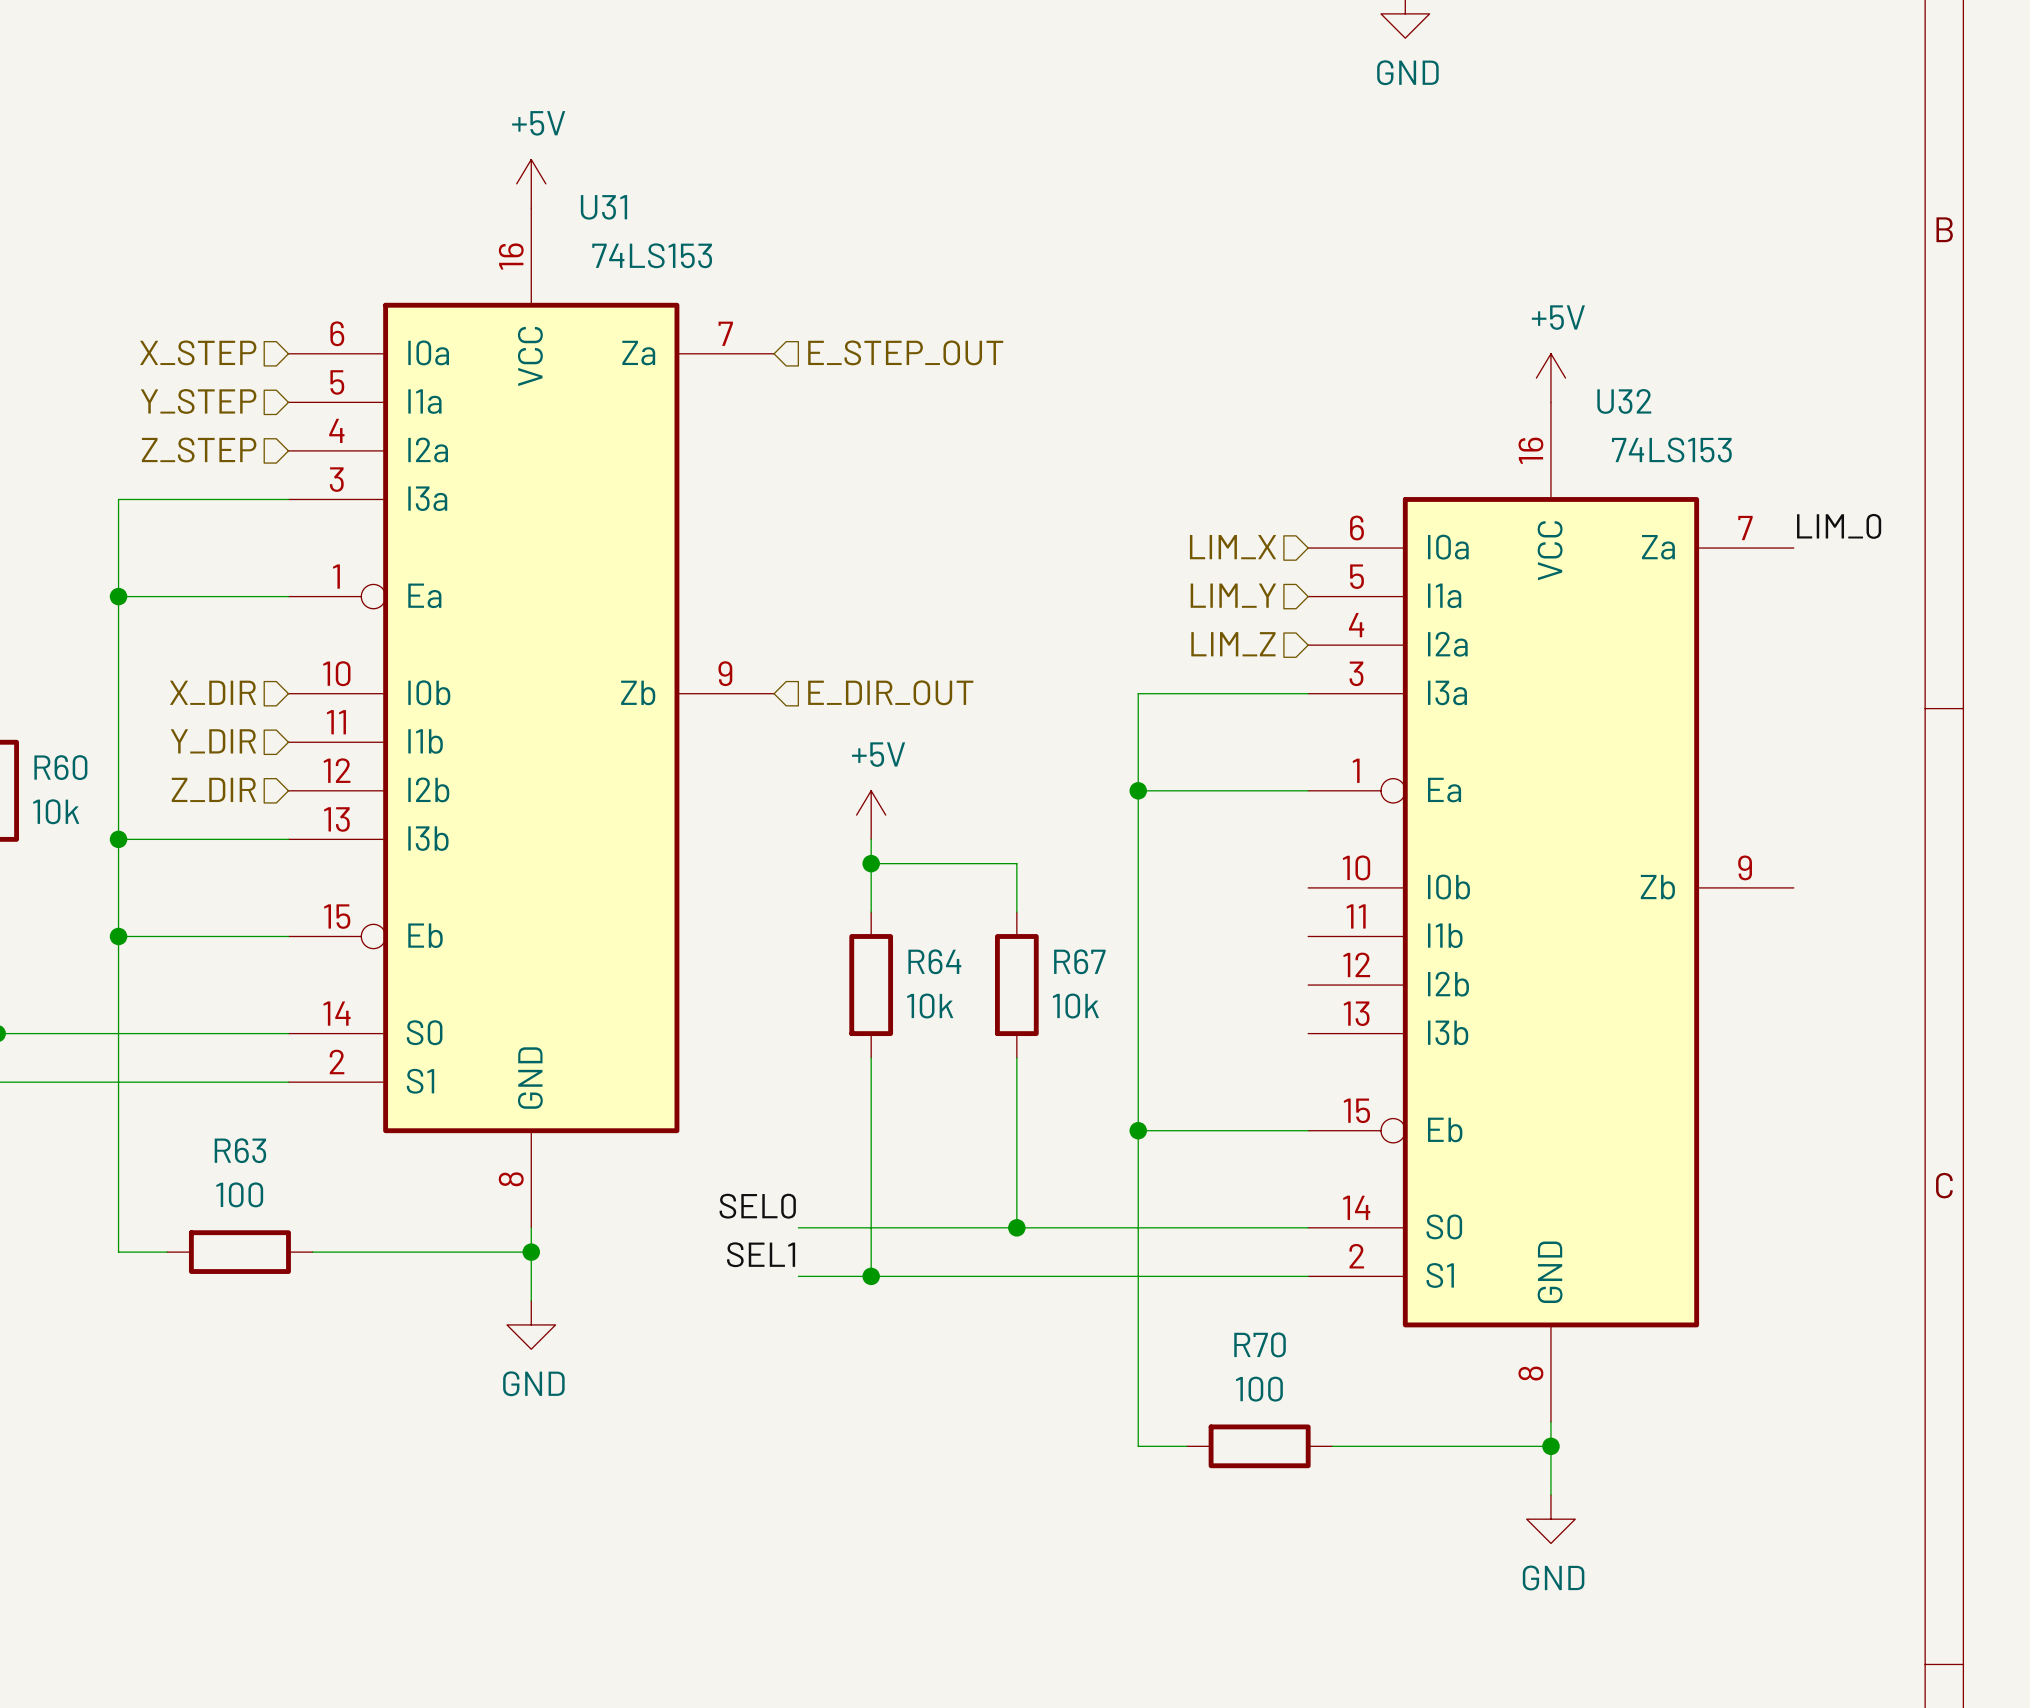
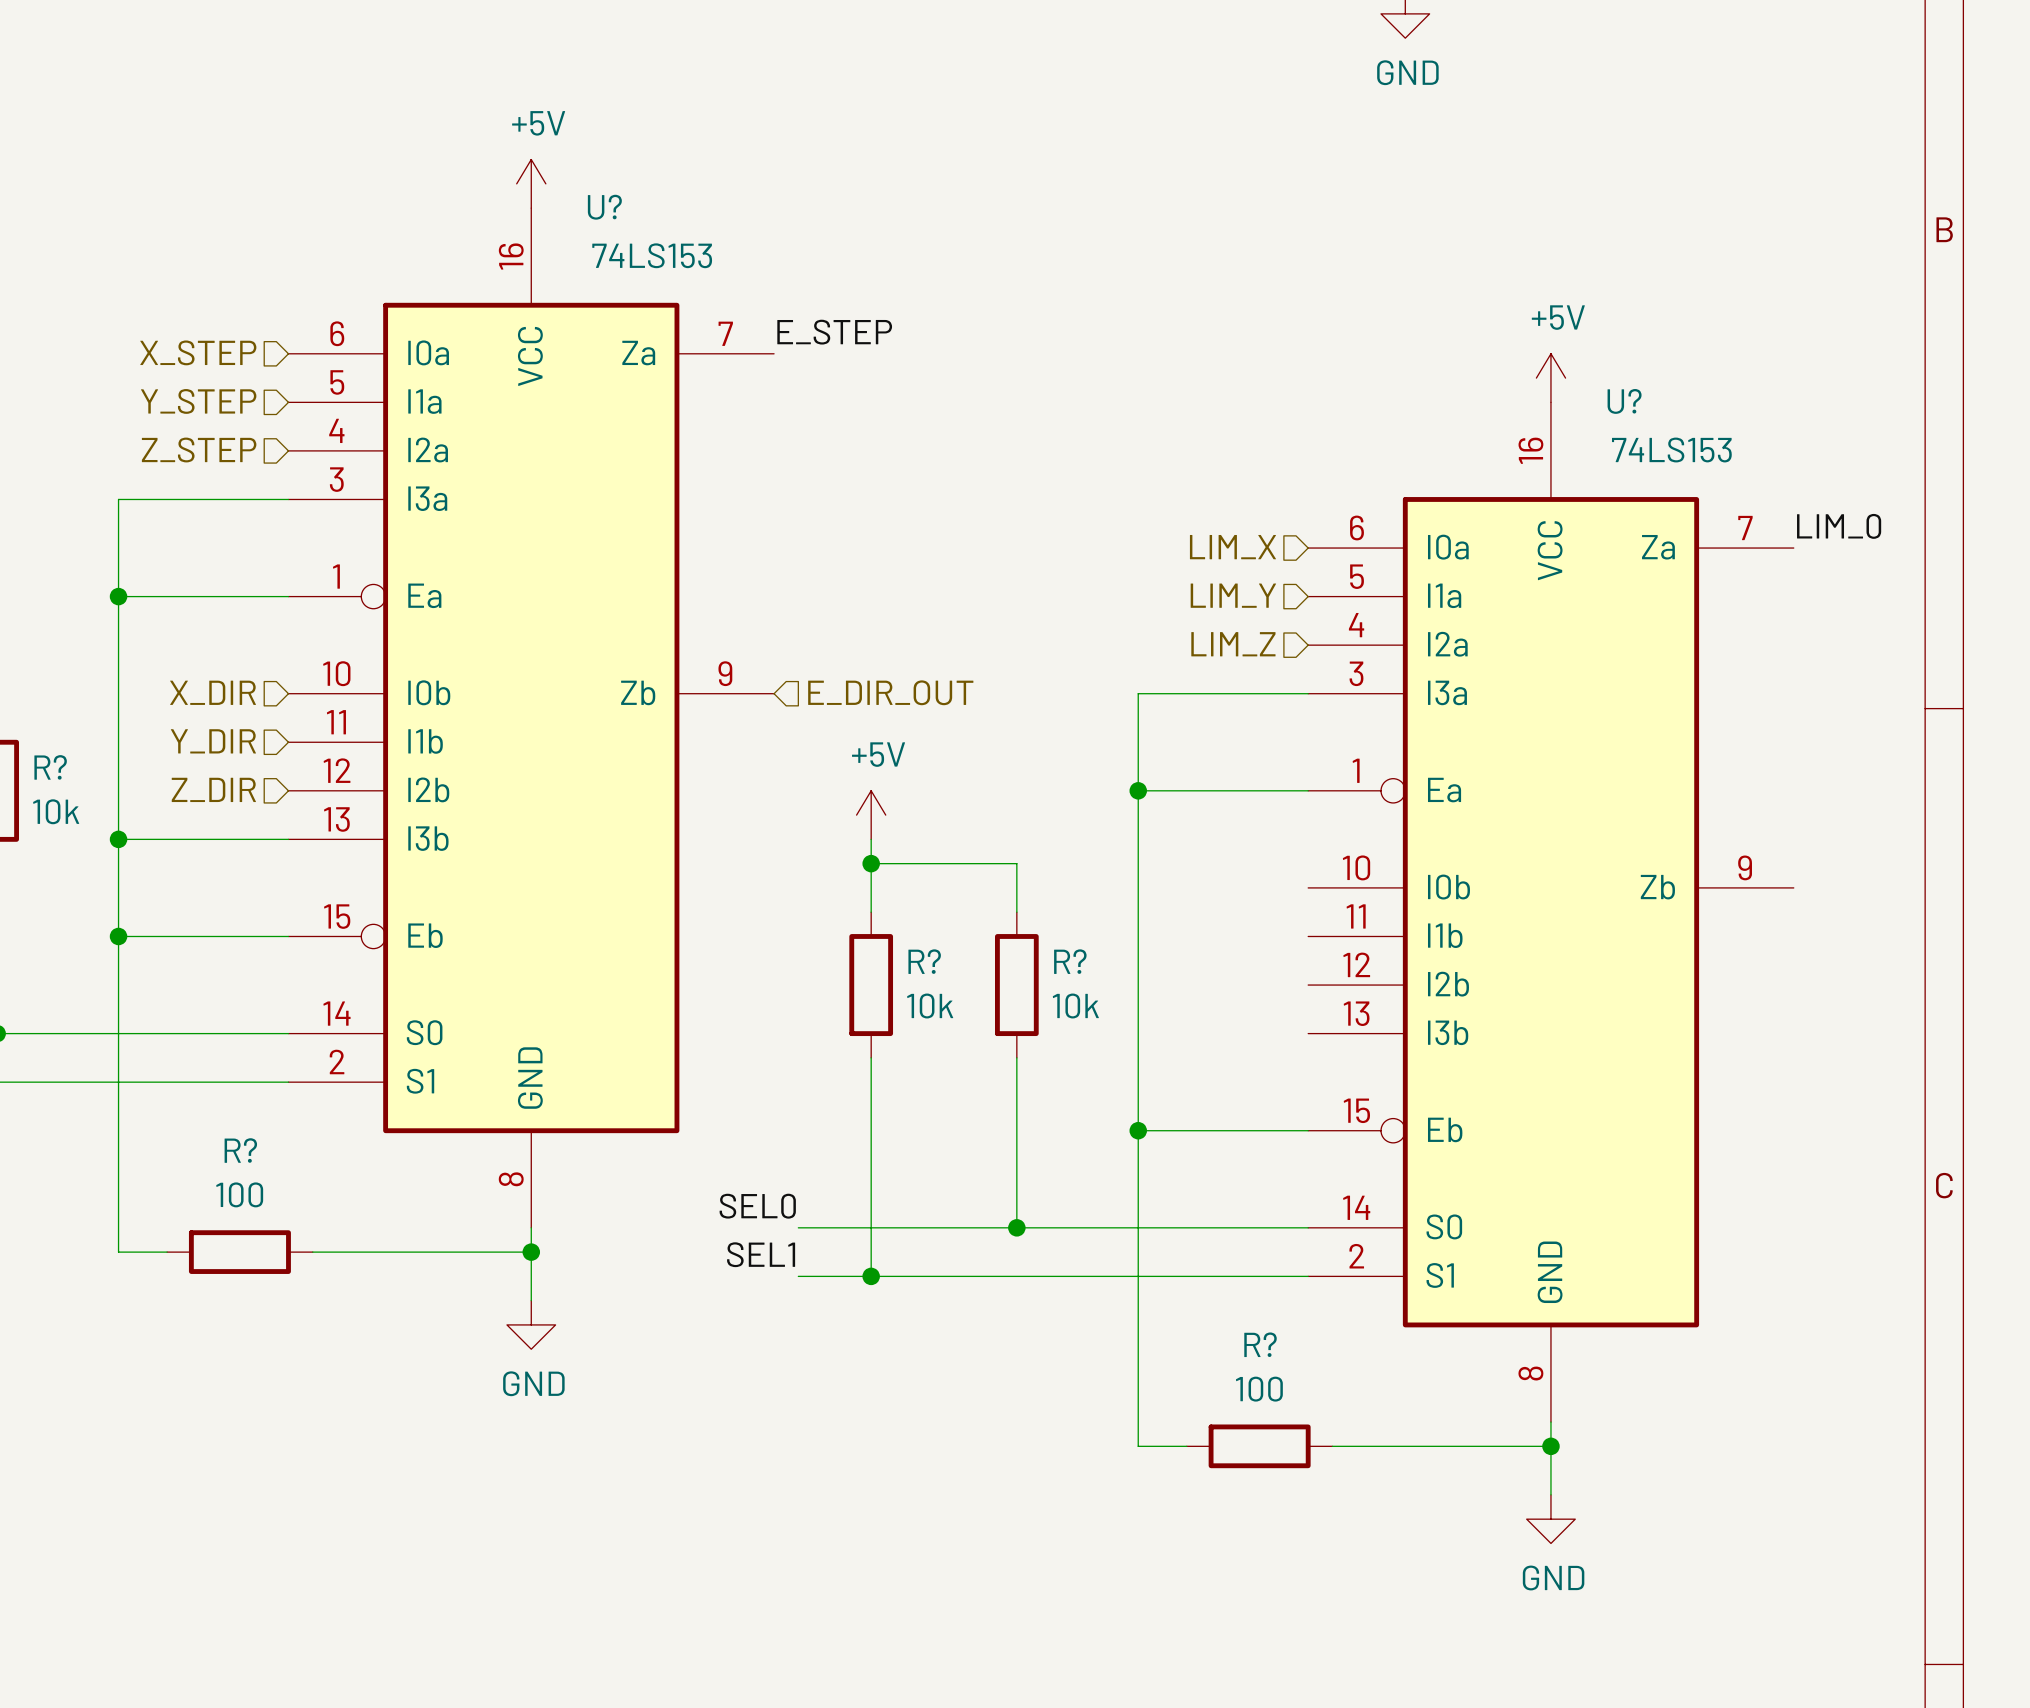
U31 name: U31 (603, 207) -> U? (604, 207)
label: none -> E_STEP (834, 332)
hierarchical label: E_STEP_OUT (905, 352) -> none
U32 name: U32 (1624, 401) -> U? (1624, 401)
R60 name: R60 (60, 767) -> R? (50, 767)
R64 name: R64 (934, 961) -> R? (924, 961)
R67 name: R67 (1079, 961) -> R? (1070, 961)
R63 name: R63 (240, 1150) -> R? (240, 1150)
R70 name: R70 (1260, 1344) -> R? (1260, 1344)

